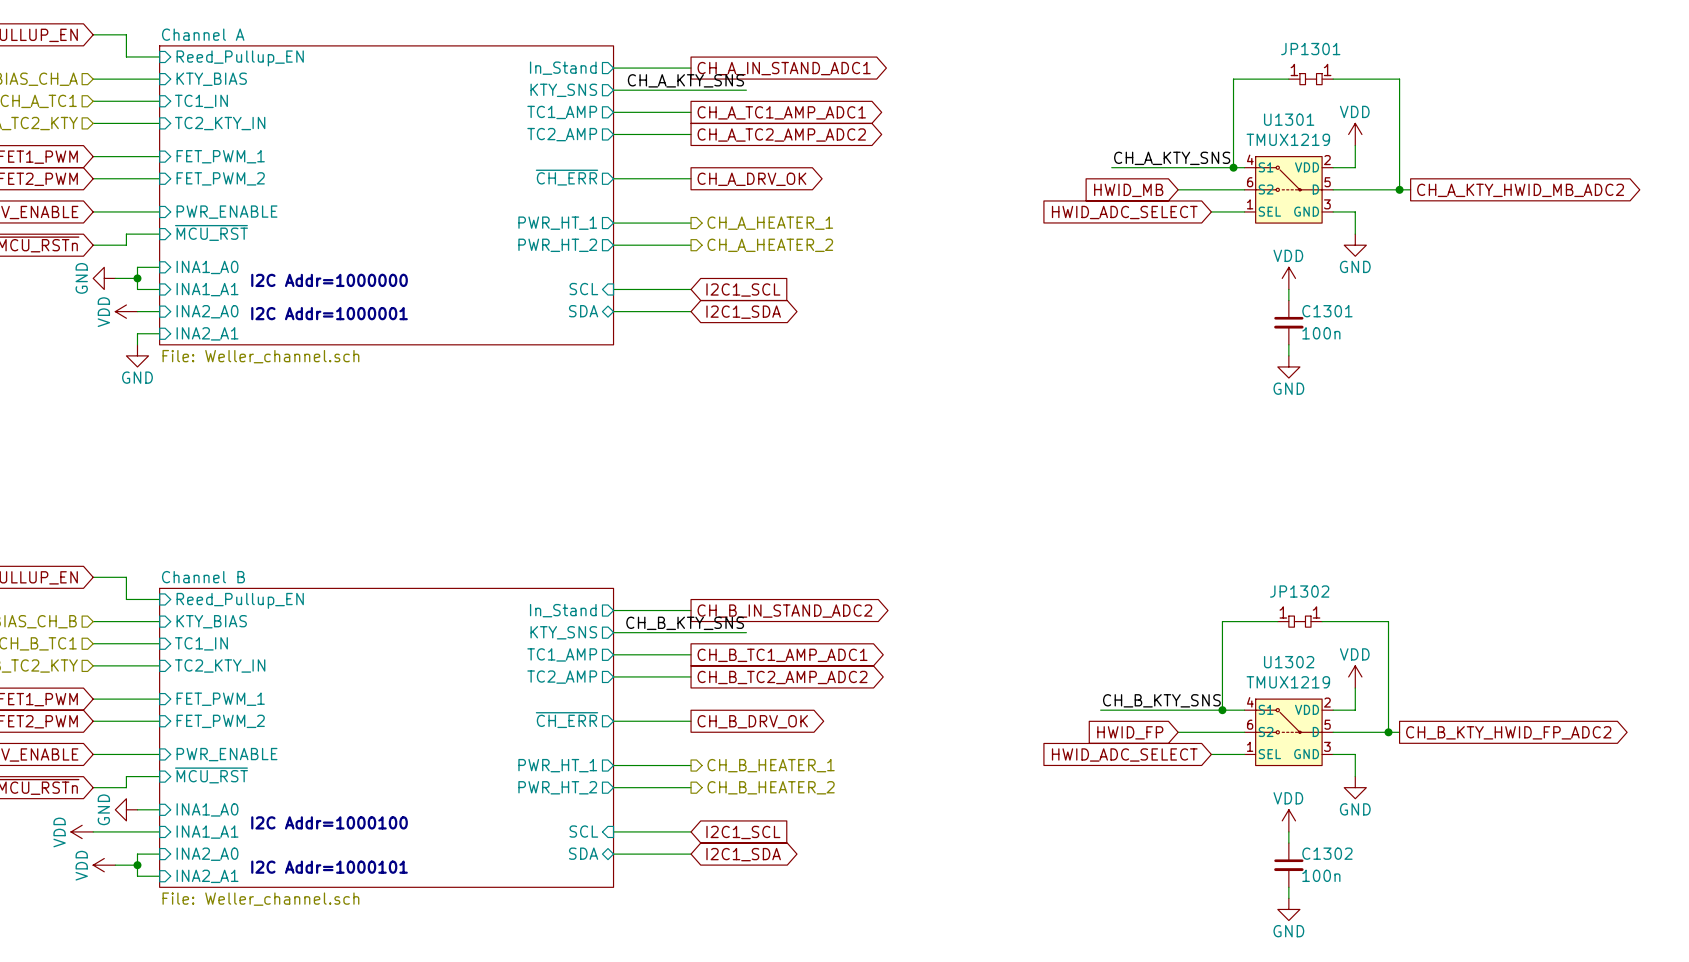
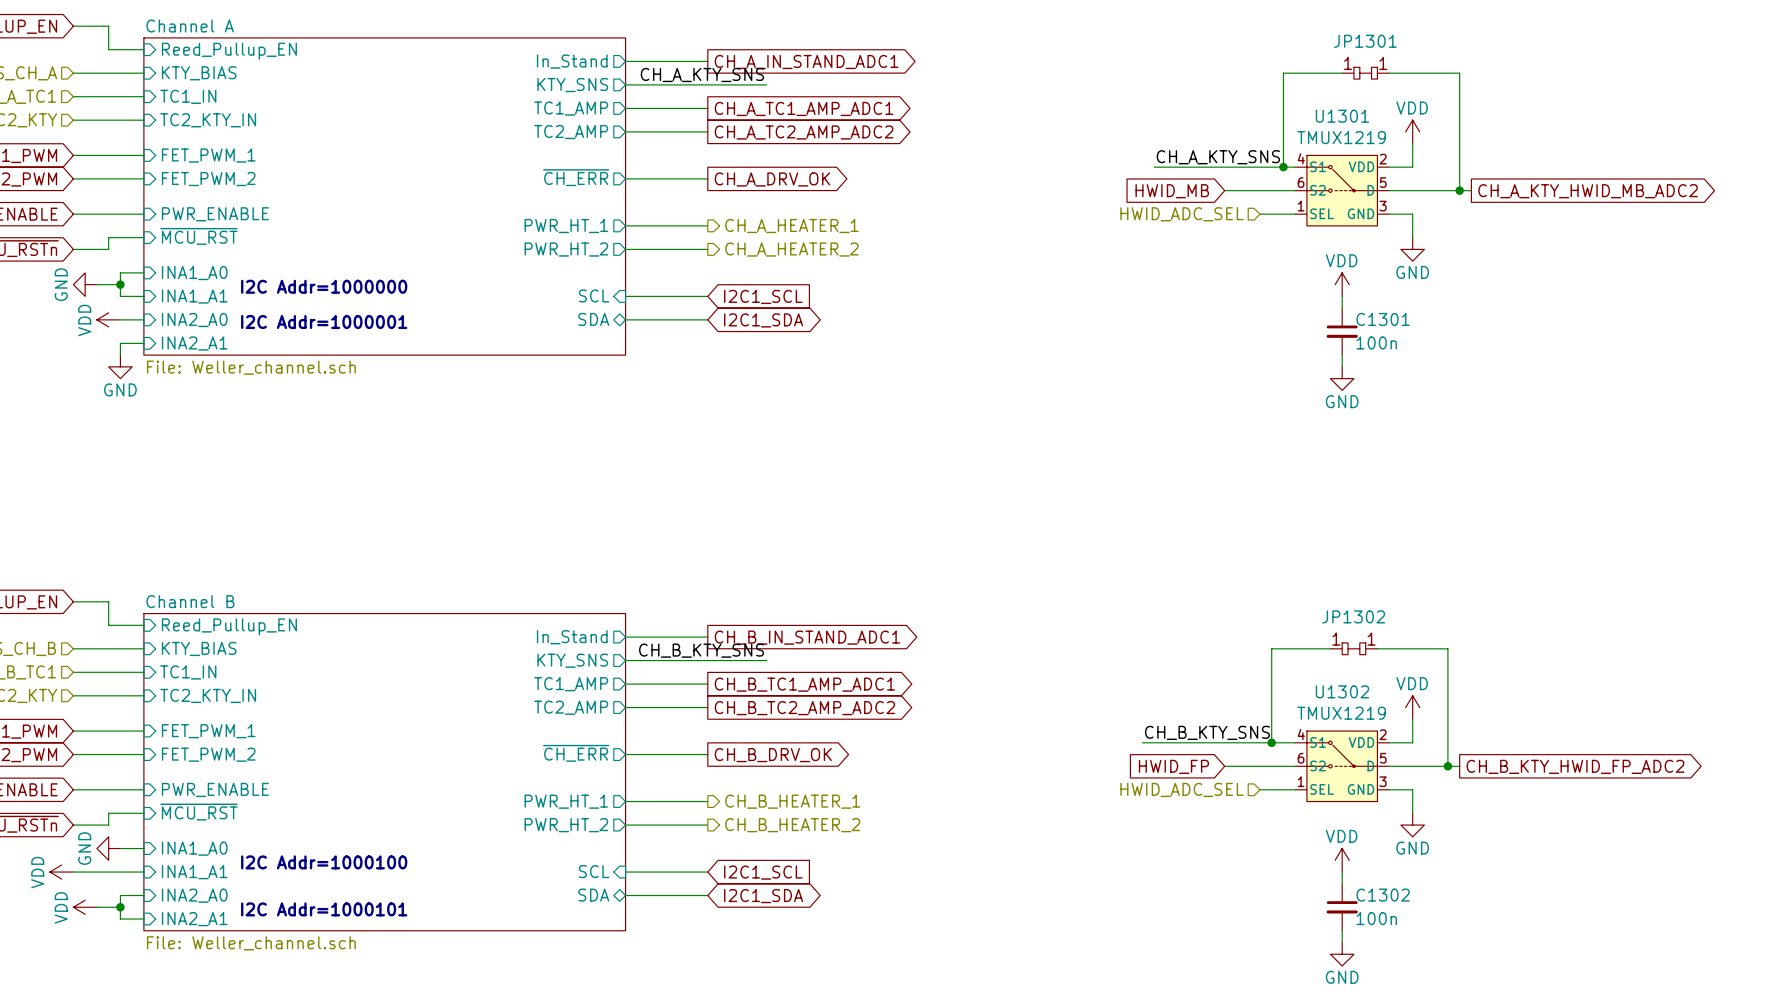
global label: HWID_ADC_SELECT (1124, 212) -> none
hierarchical label: none -> HWID_ADC_SEL (1182, 214)
global label: CH_B_IN_STAND_ADC2 (784, 611) -> CH_B_IN_STAND_ADC1 (807, 637)
global label: HWID_ADC_SELECT (1124, 754) -> none
hierarchical label: none -> HWID_ADC_SEL (1182, 789)

